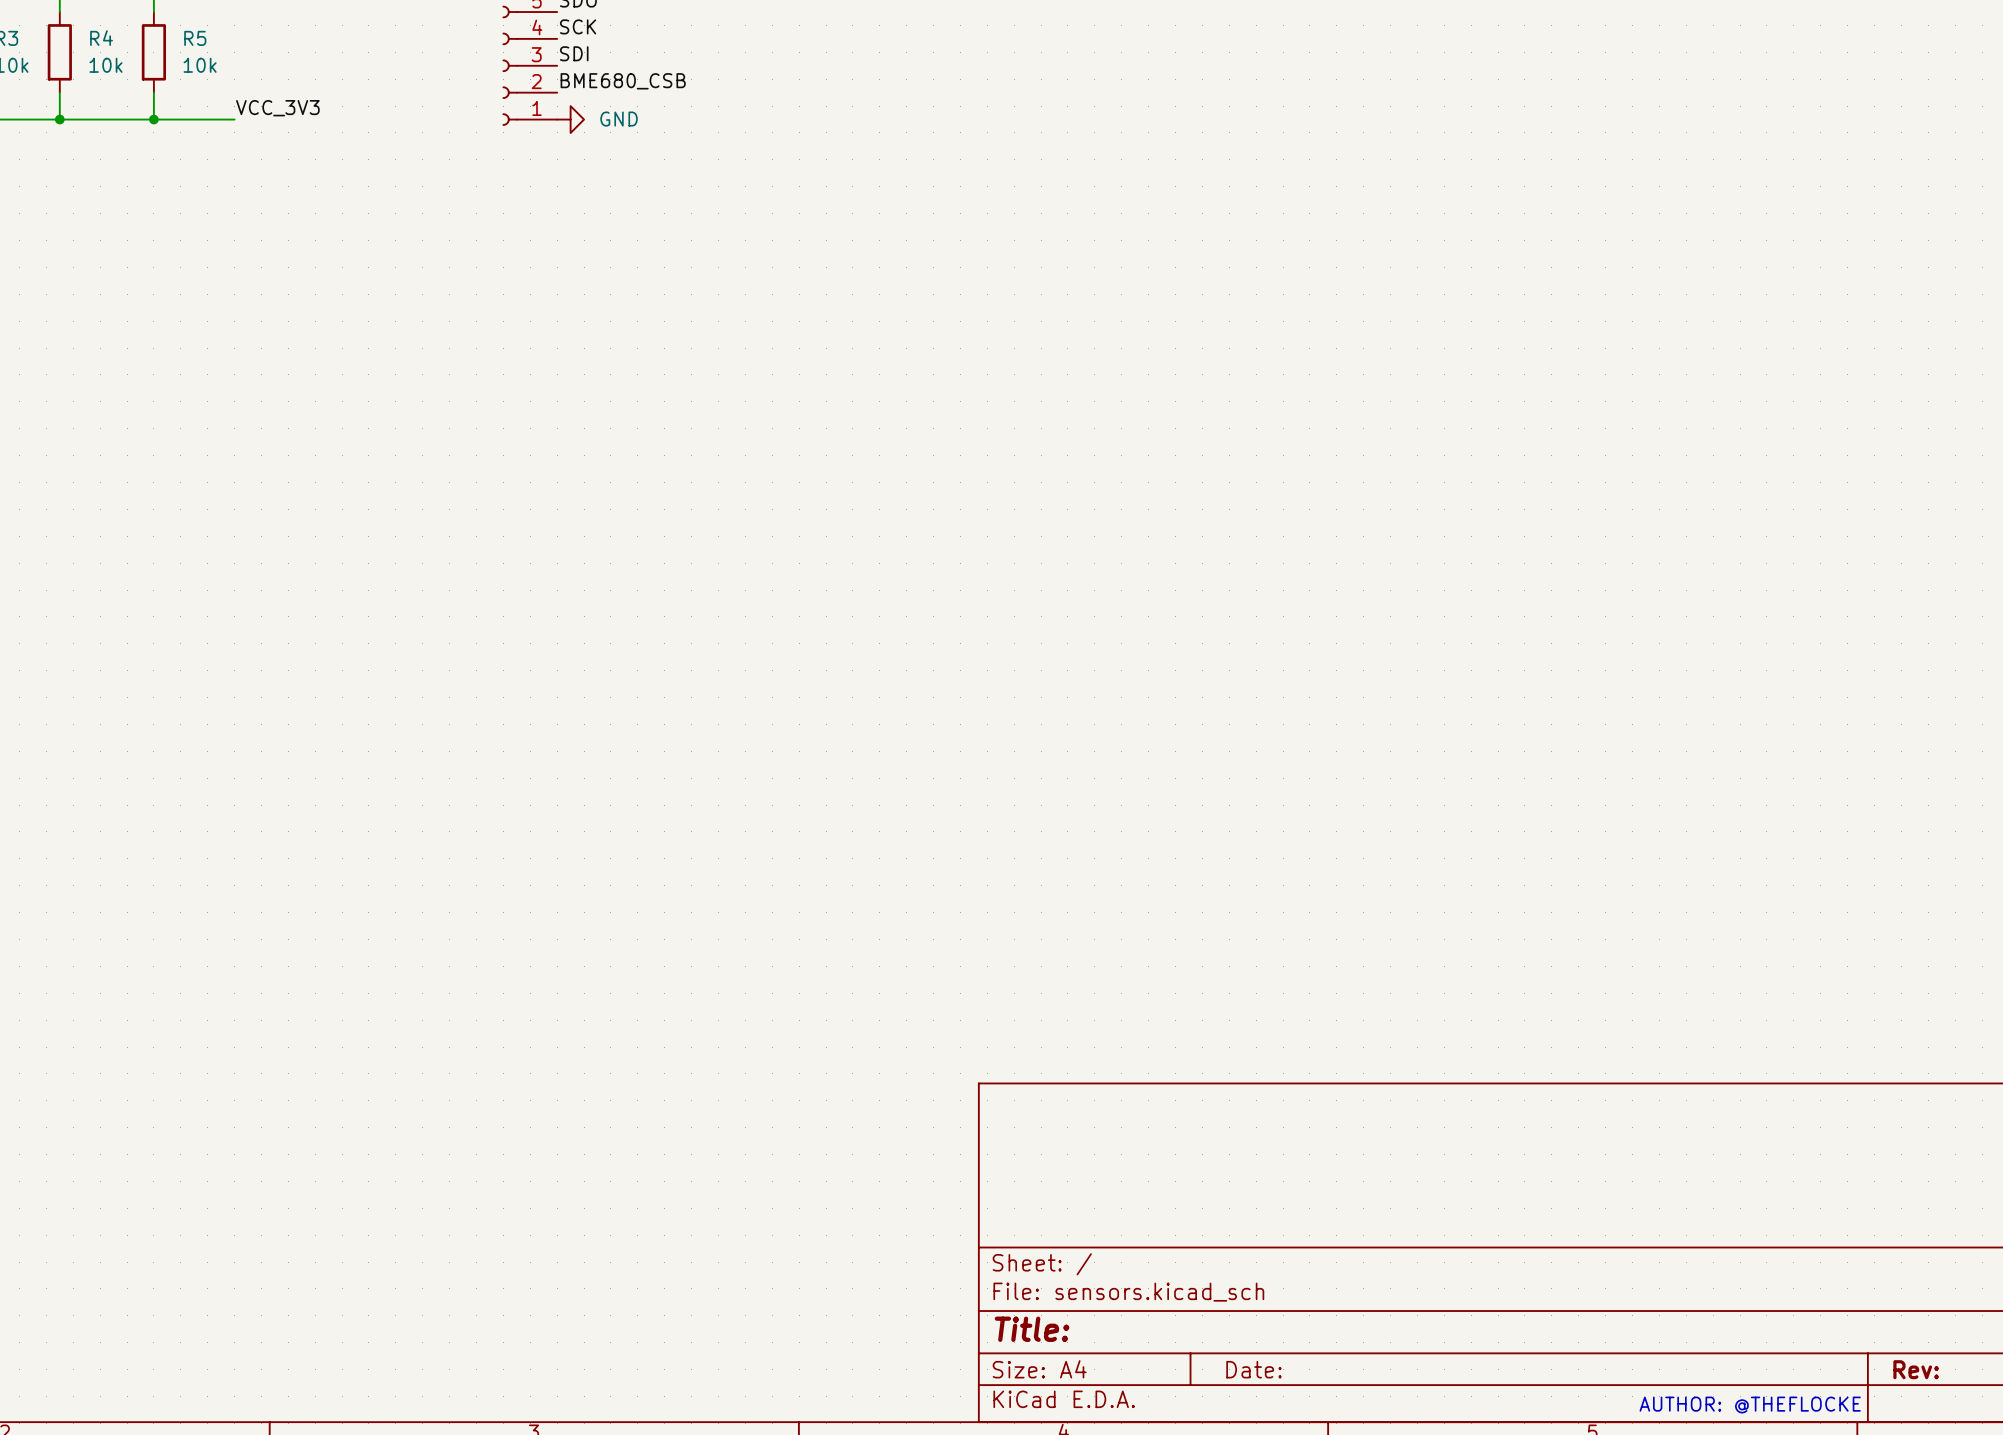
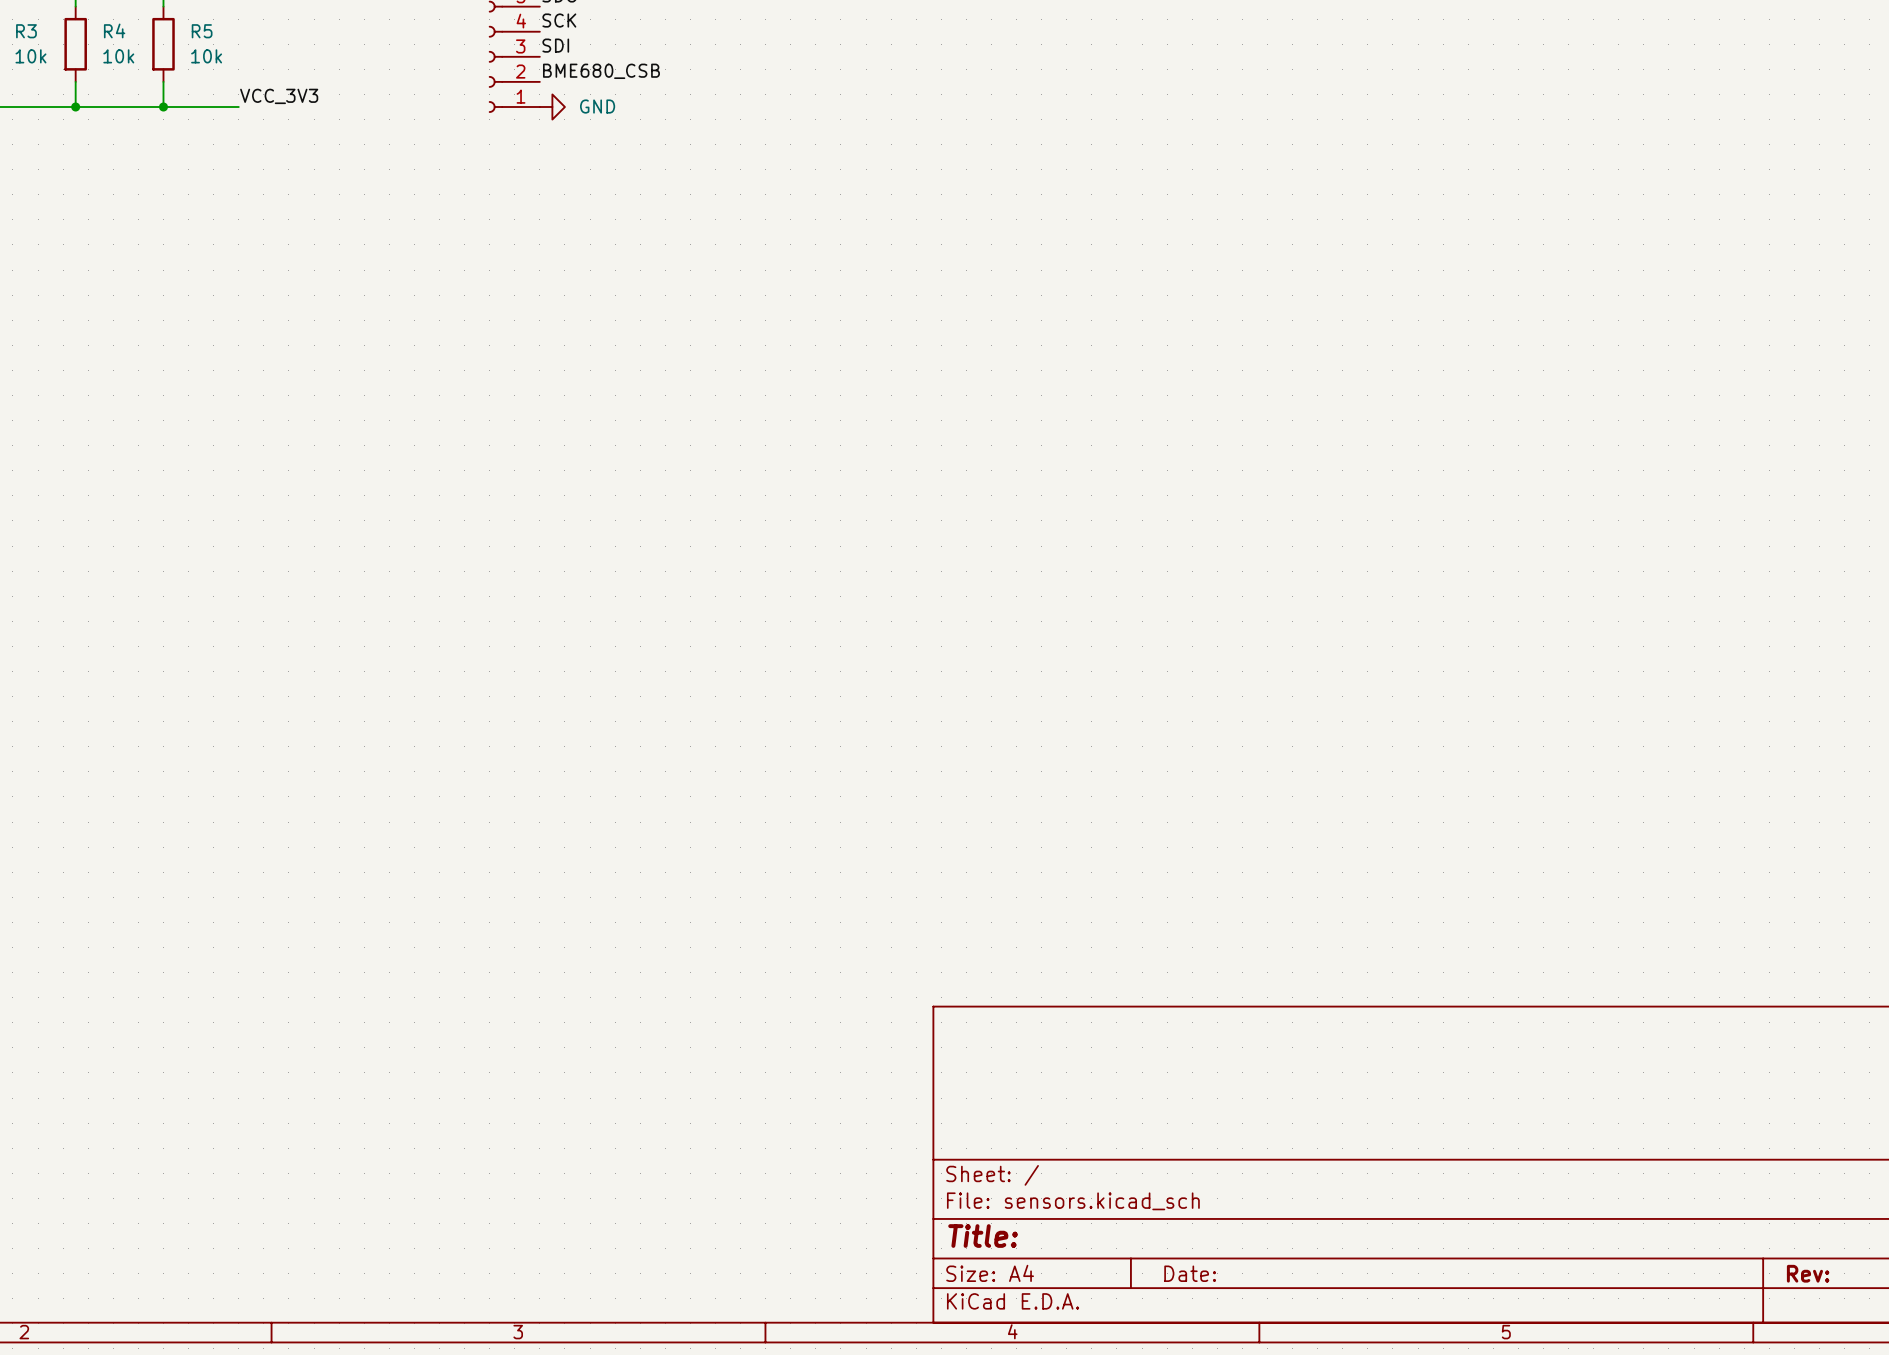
text: AUTHOR: @THEFLOCKE (1750, 1405) -> none

